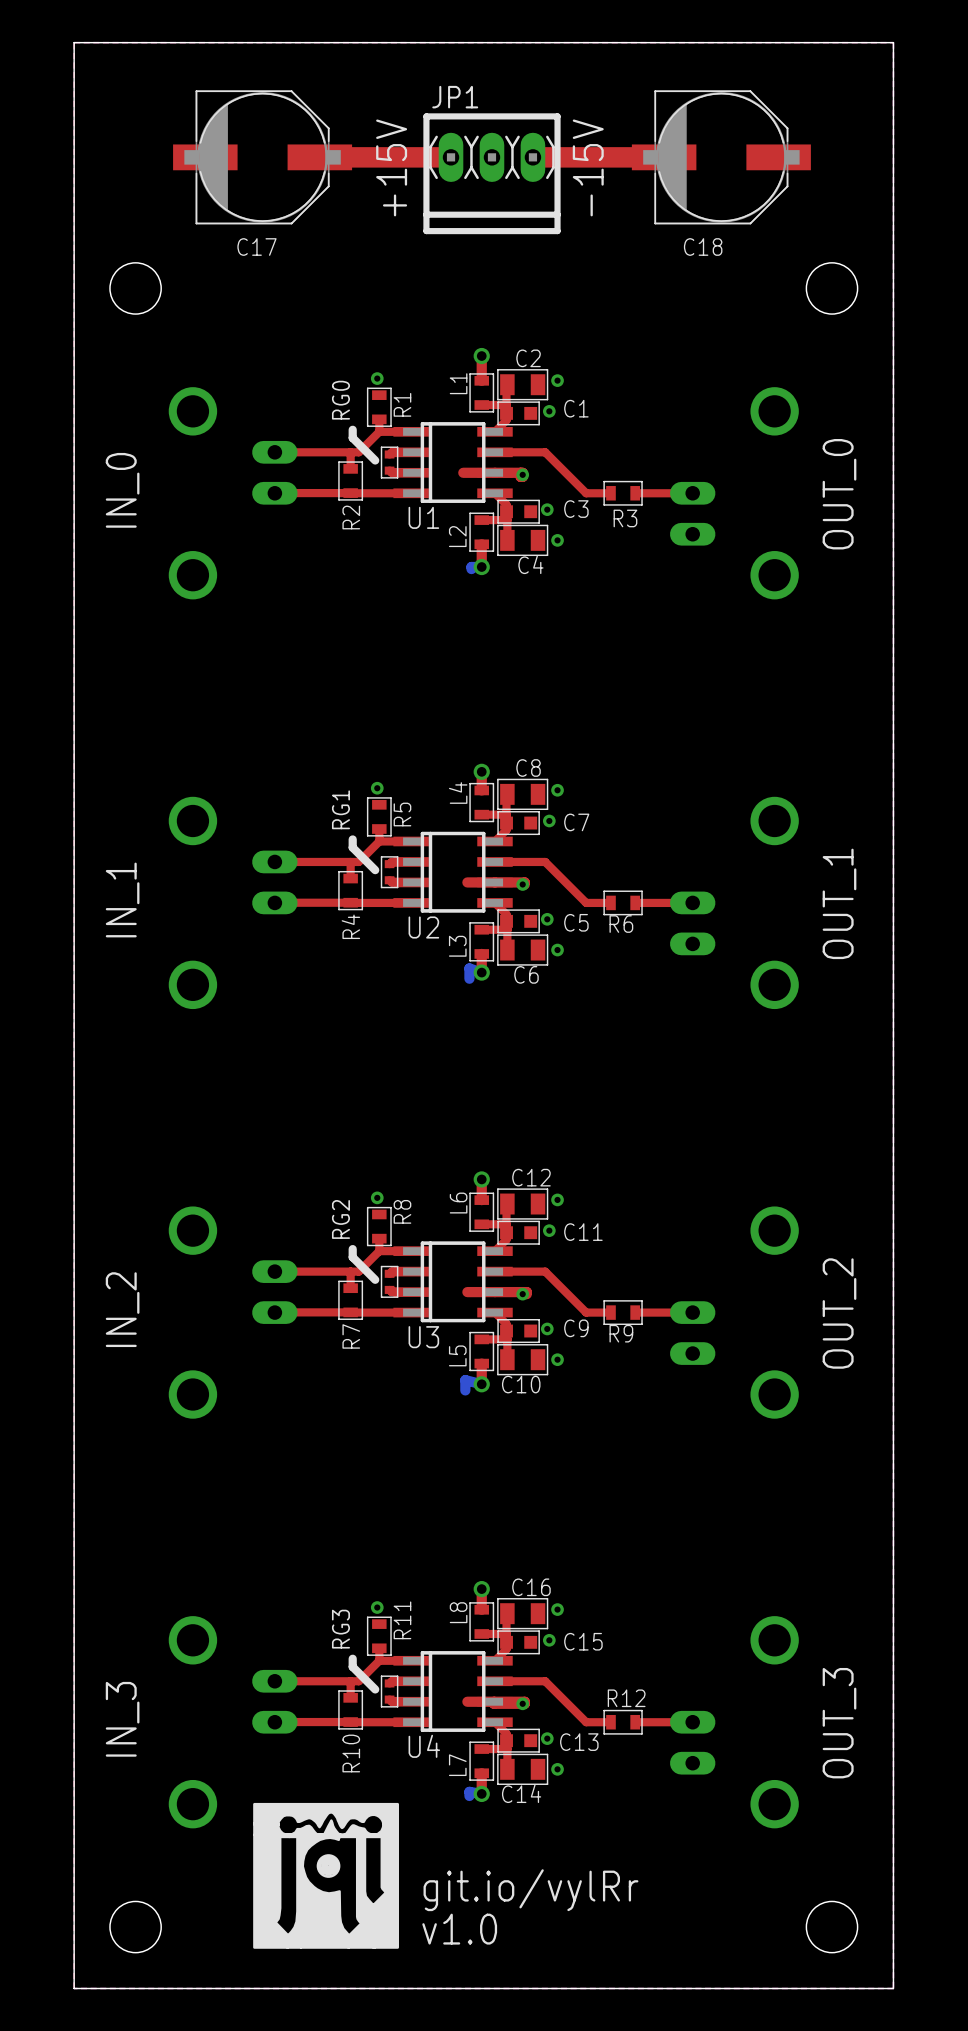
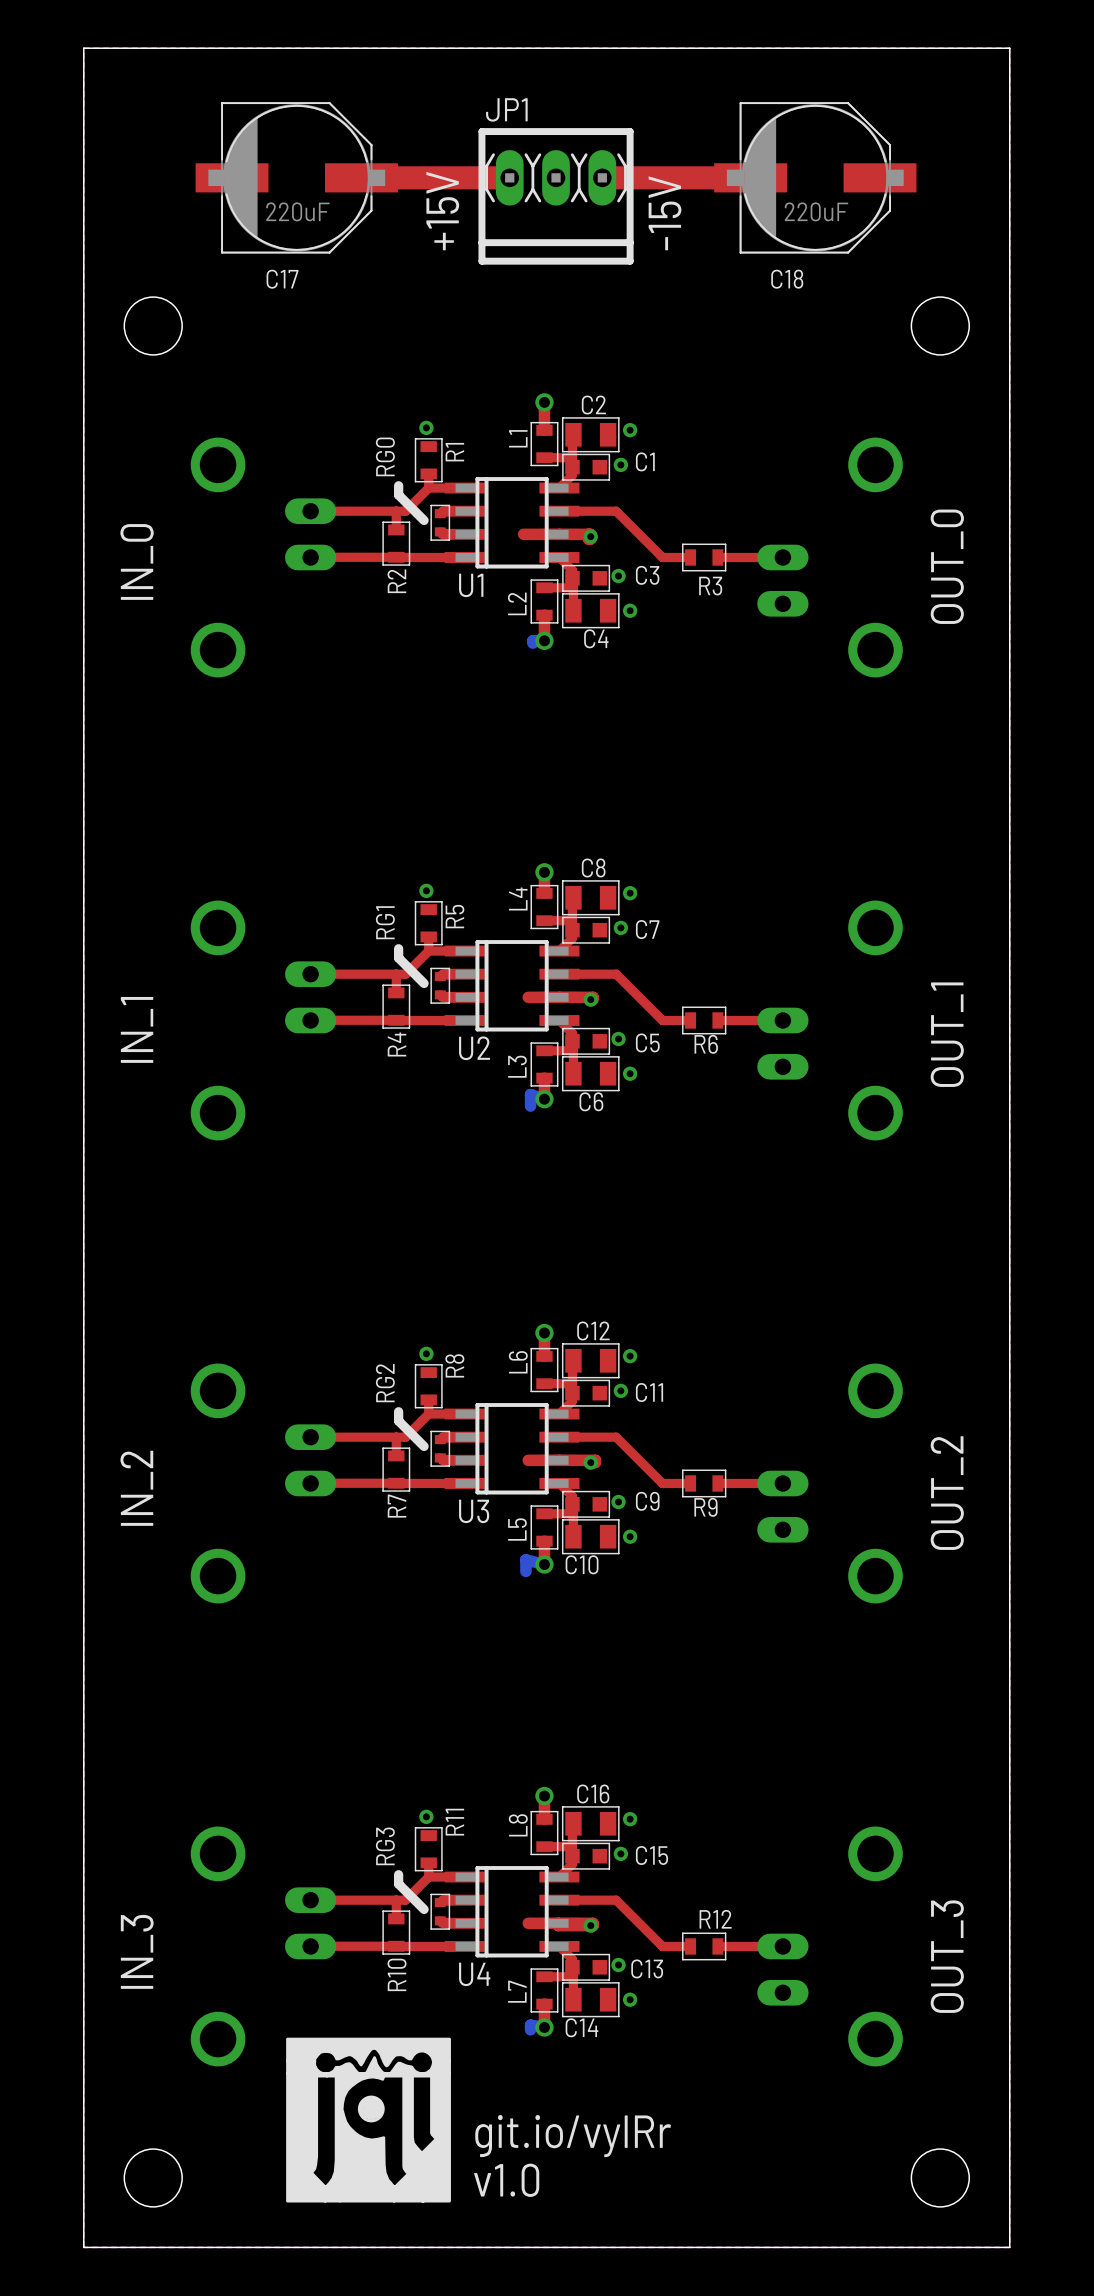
C17 value: none -> 220uF (297, 211)
C18 value: none -> 220uF (816, 211)

